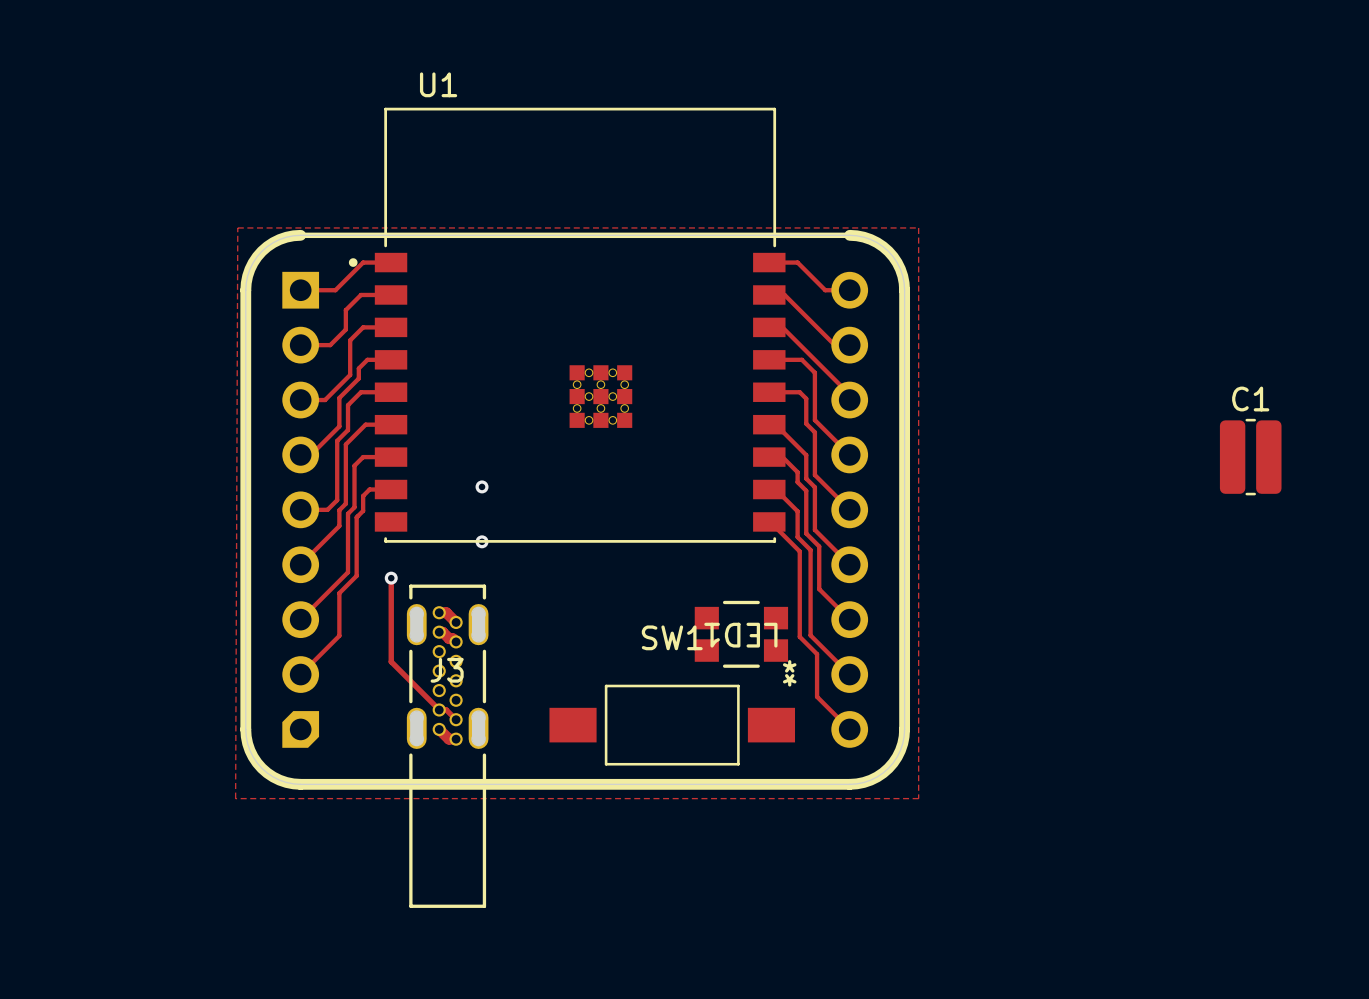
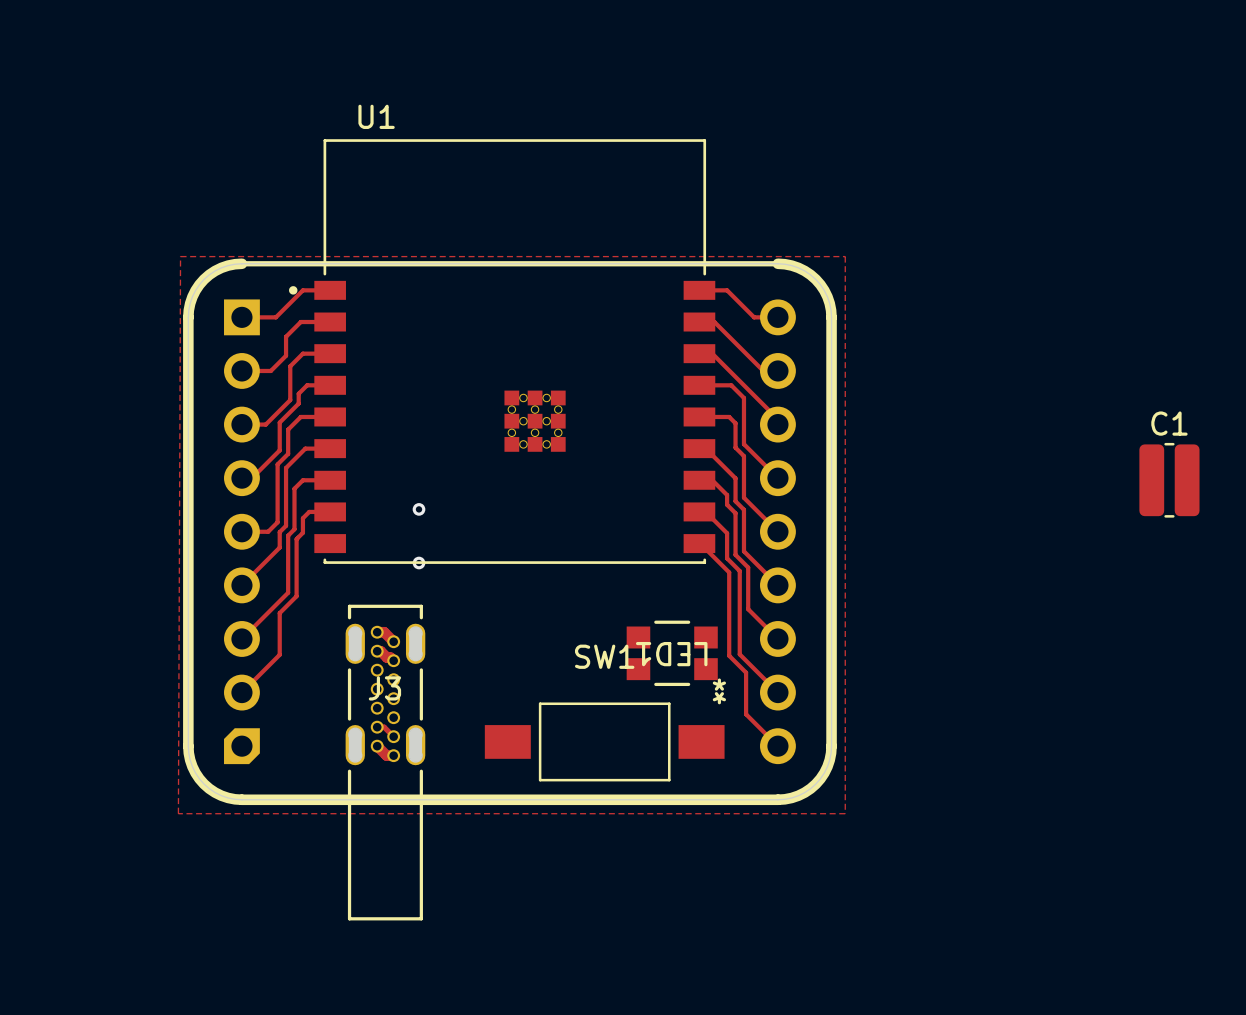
track: (391, 578) (391, 661) (439, 709) -> none
via: (391, 578) -> none

